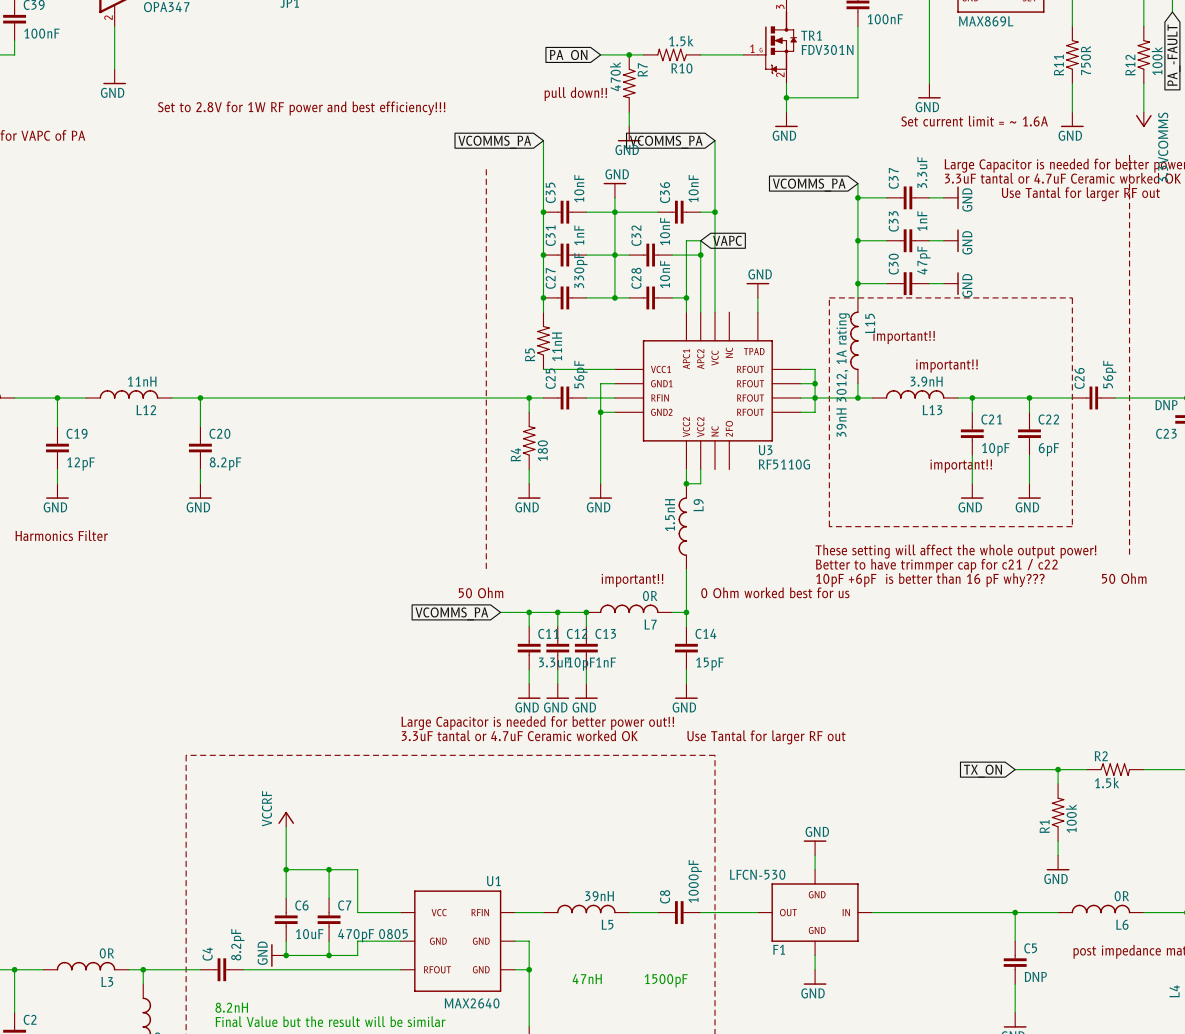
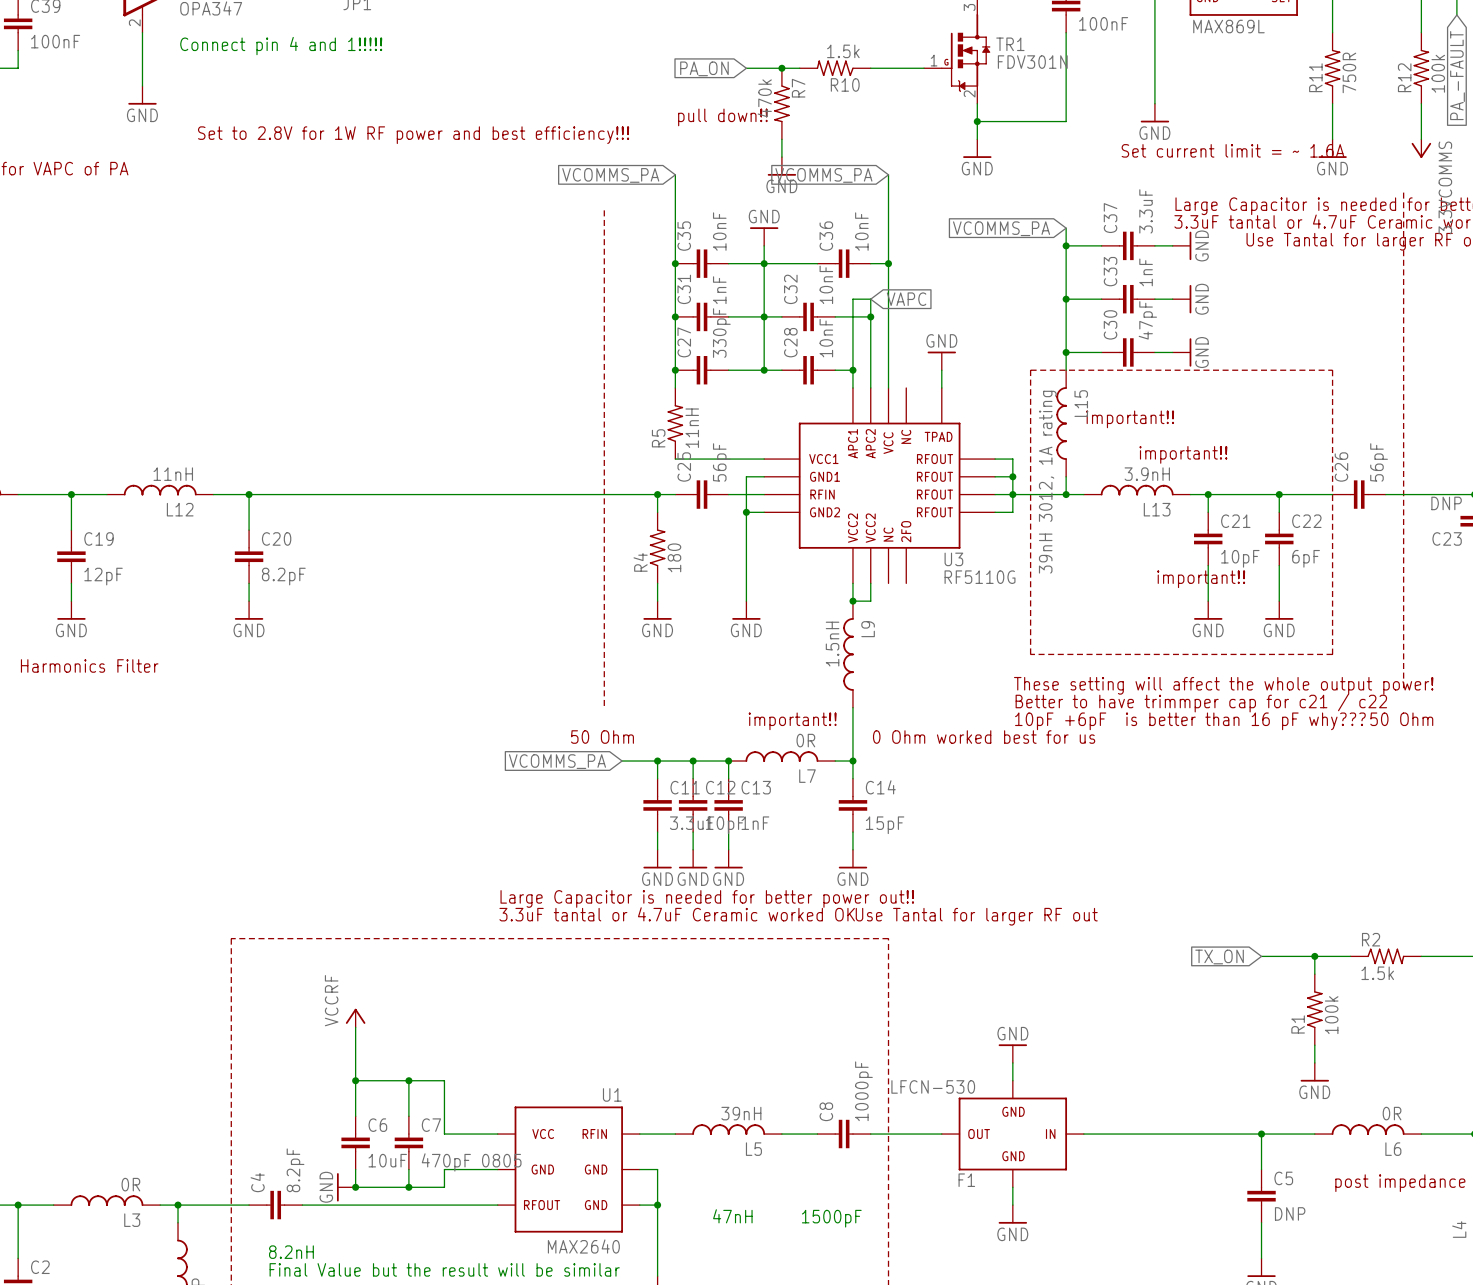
text: none -> Connect pin 4 and 1!!!!! (281, 46)

